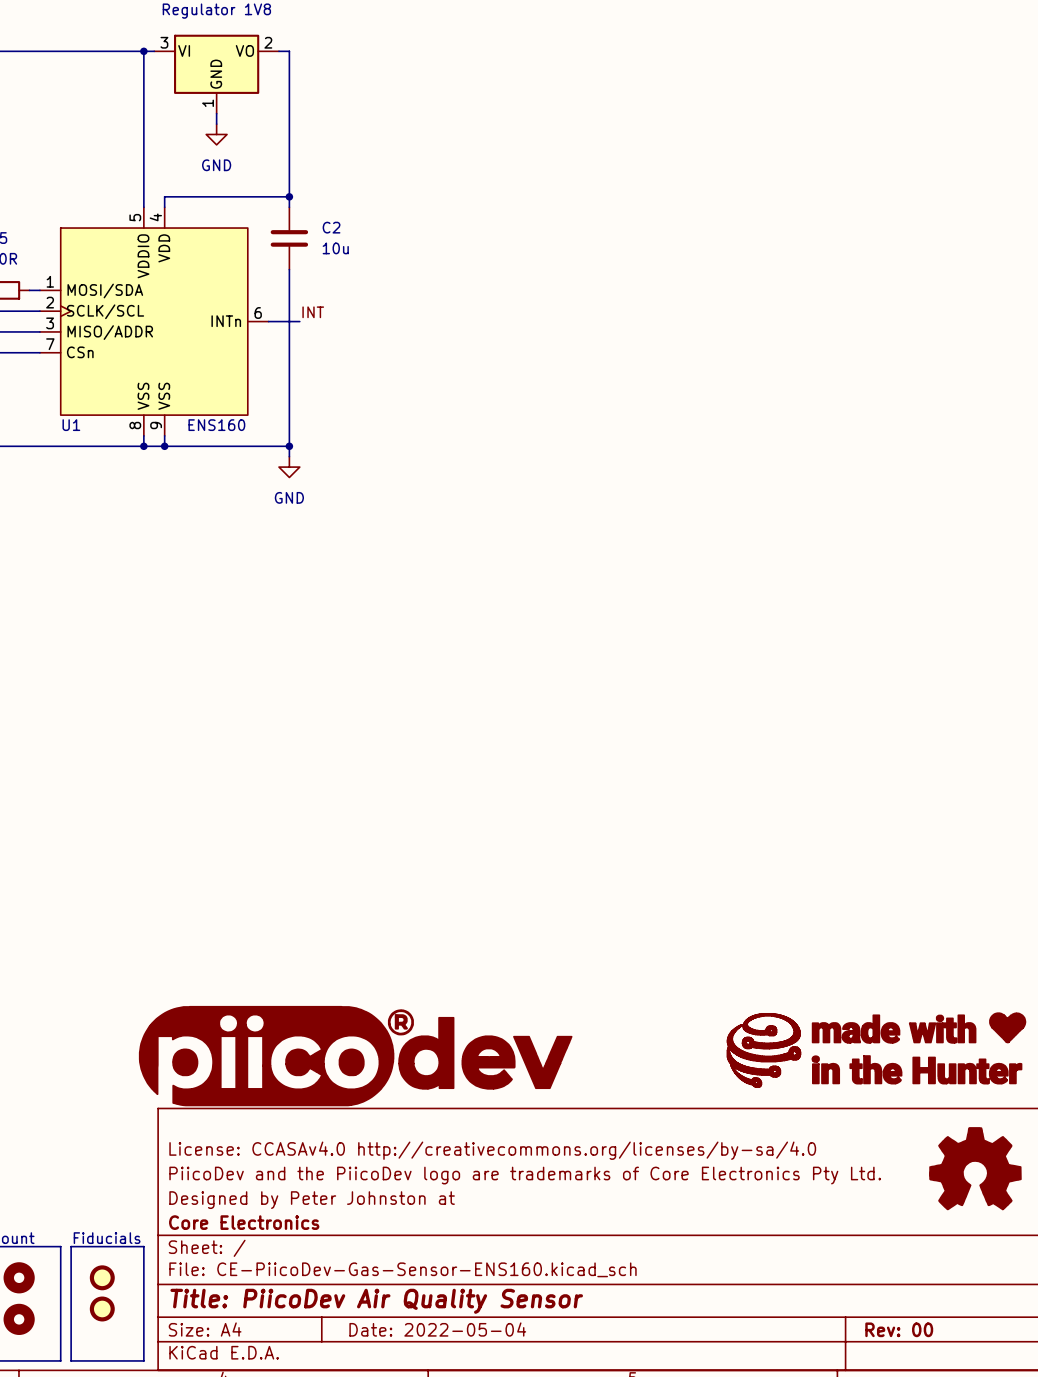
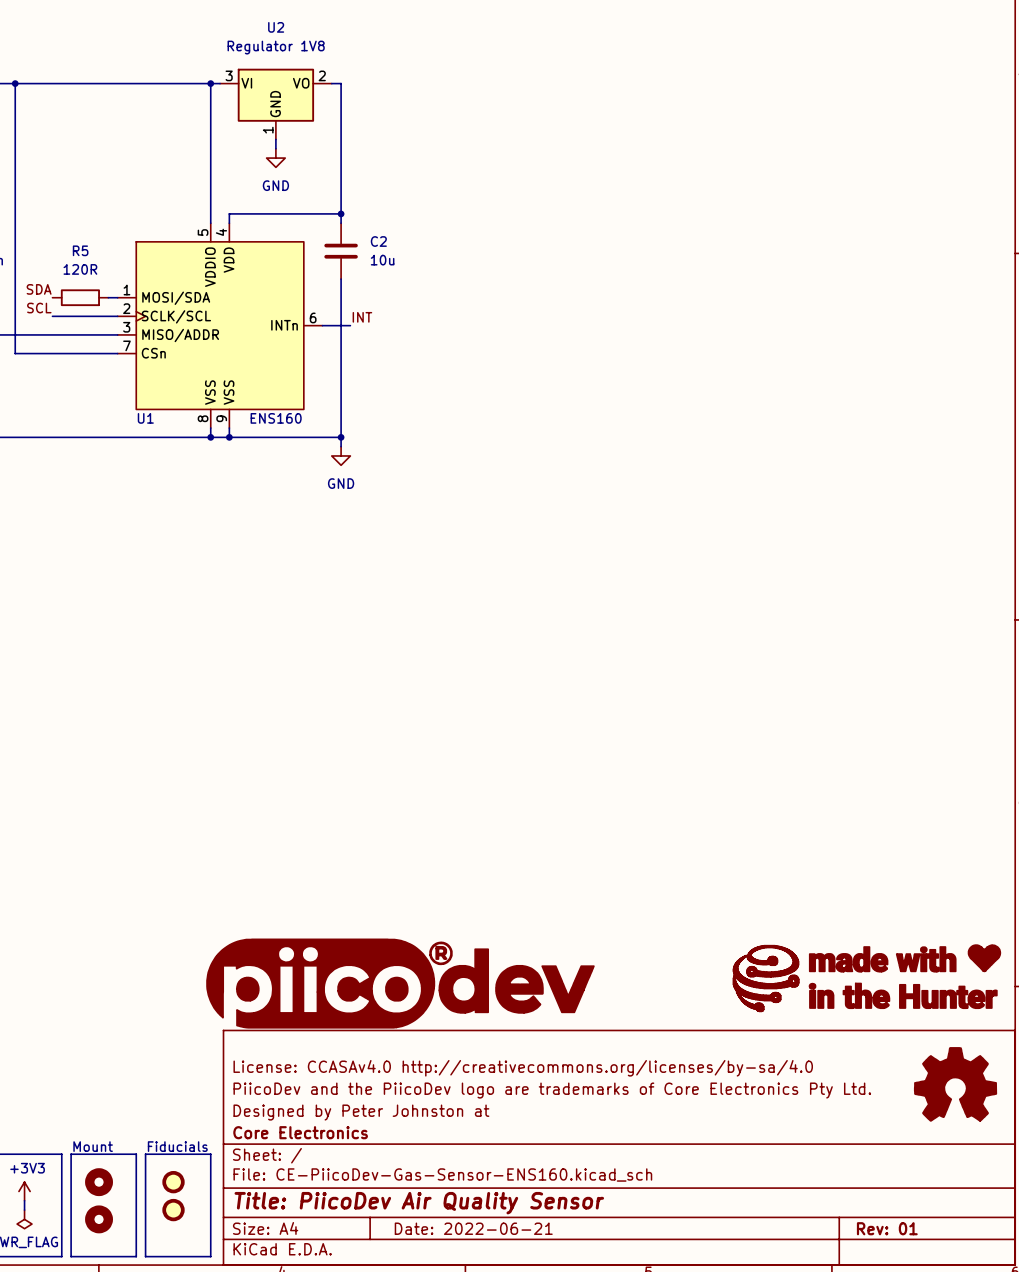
title block: Date: 2022-05-04 (437, 1329) -> Date: 2022-06-21 (473, 1228)
title block: Rev: 00 (899, 1329) -> Rev: 01 (887, 1228)

